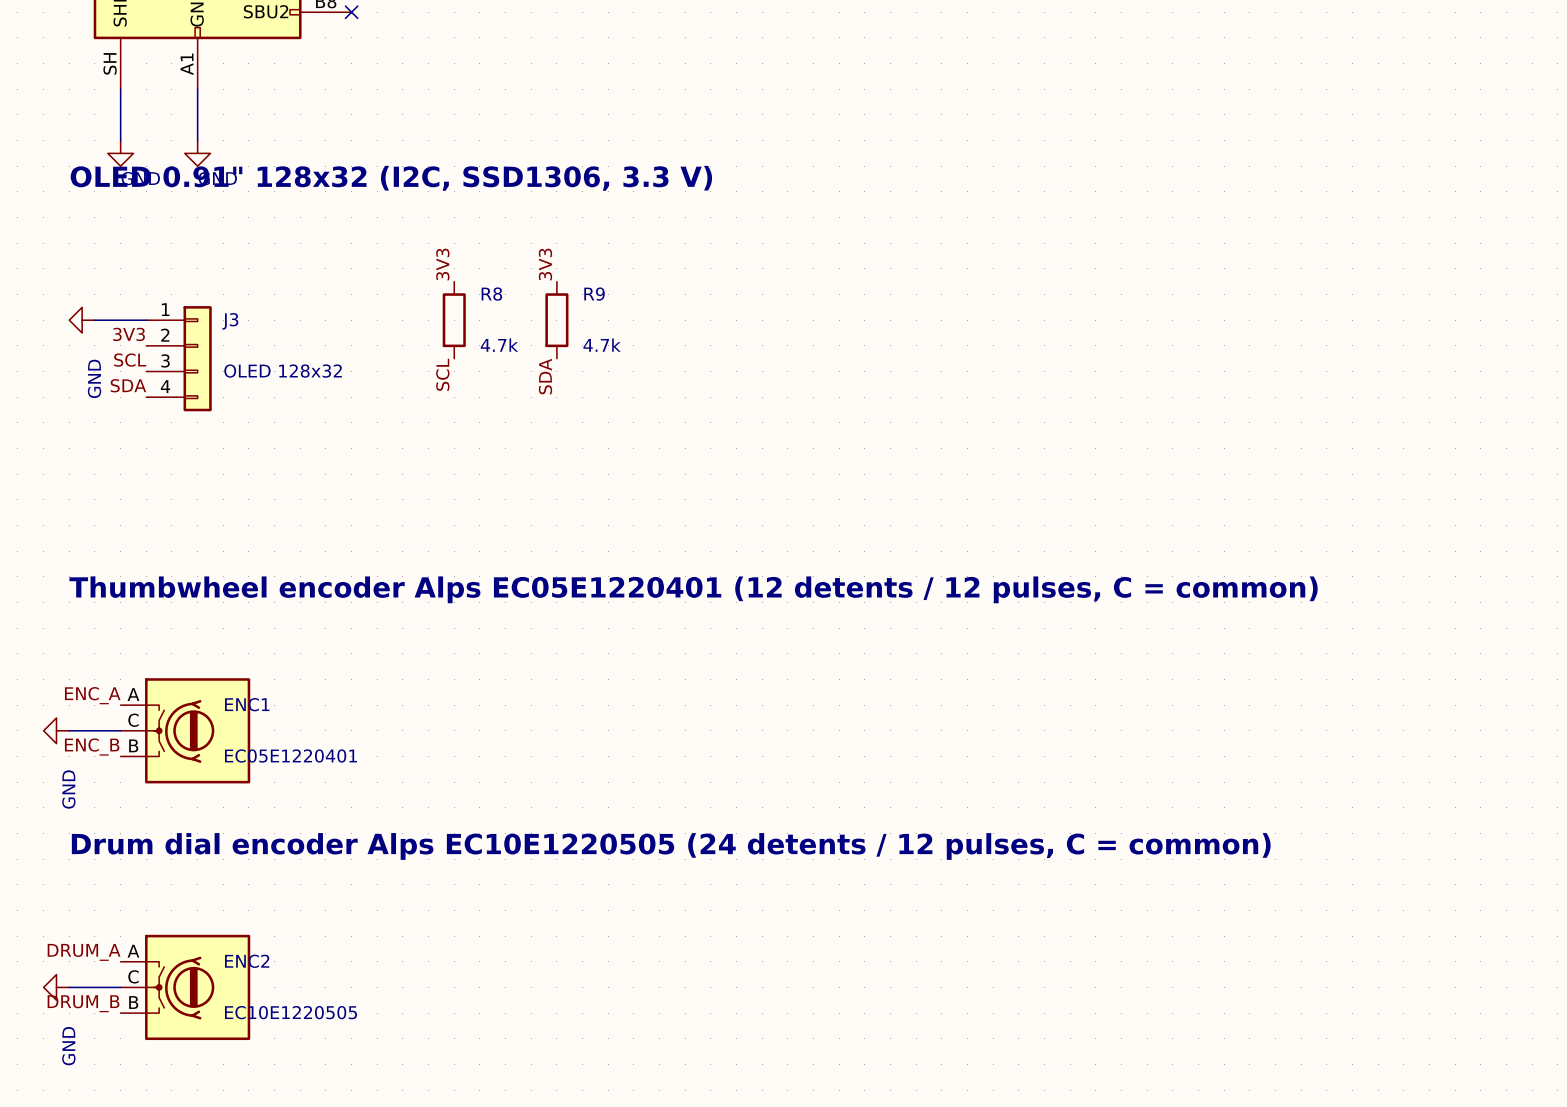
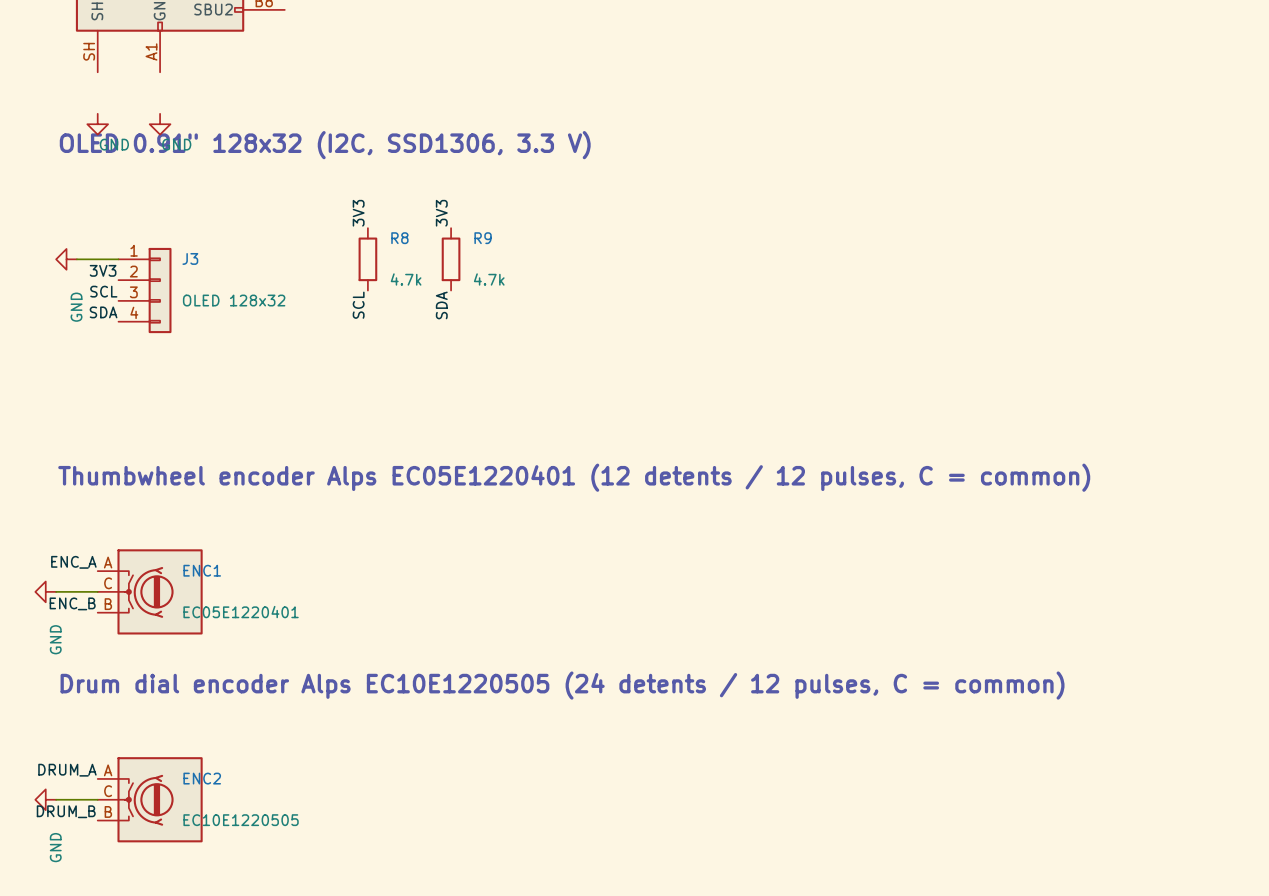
no-connect mark: (351, 12) -> none
wire: (120, 89) (120, 140) -> none
wire: (197, 89) (197, 140) -> none

